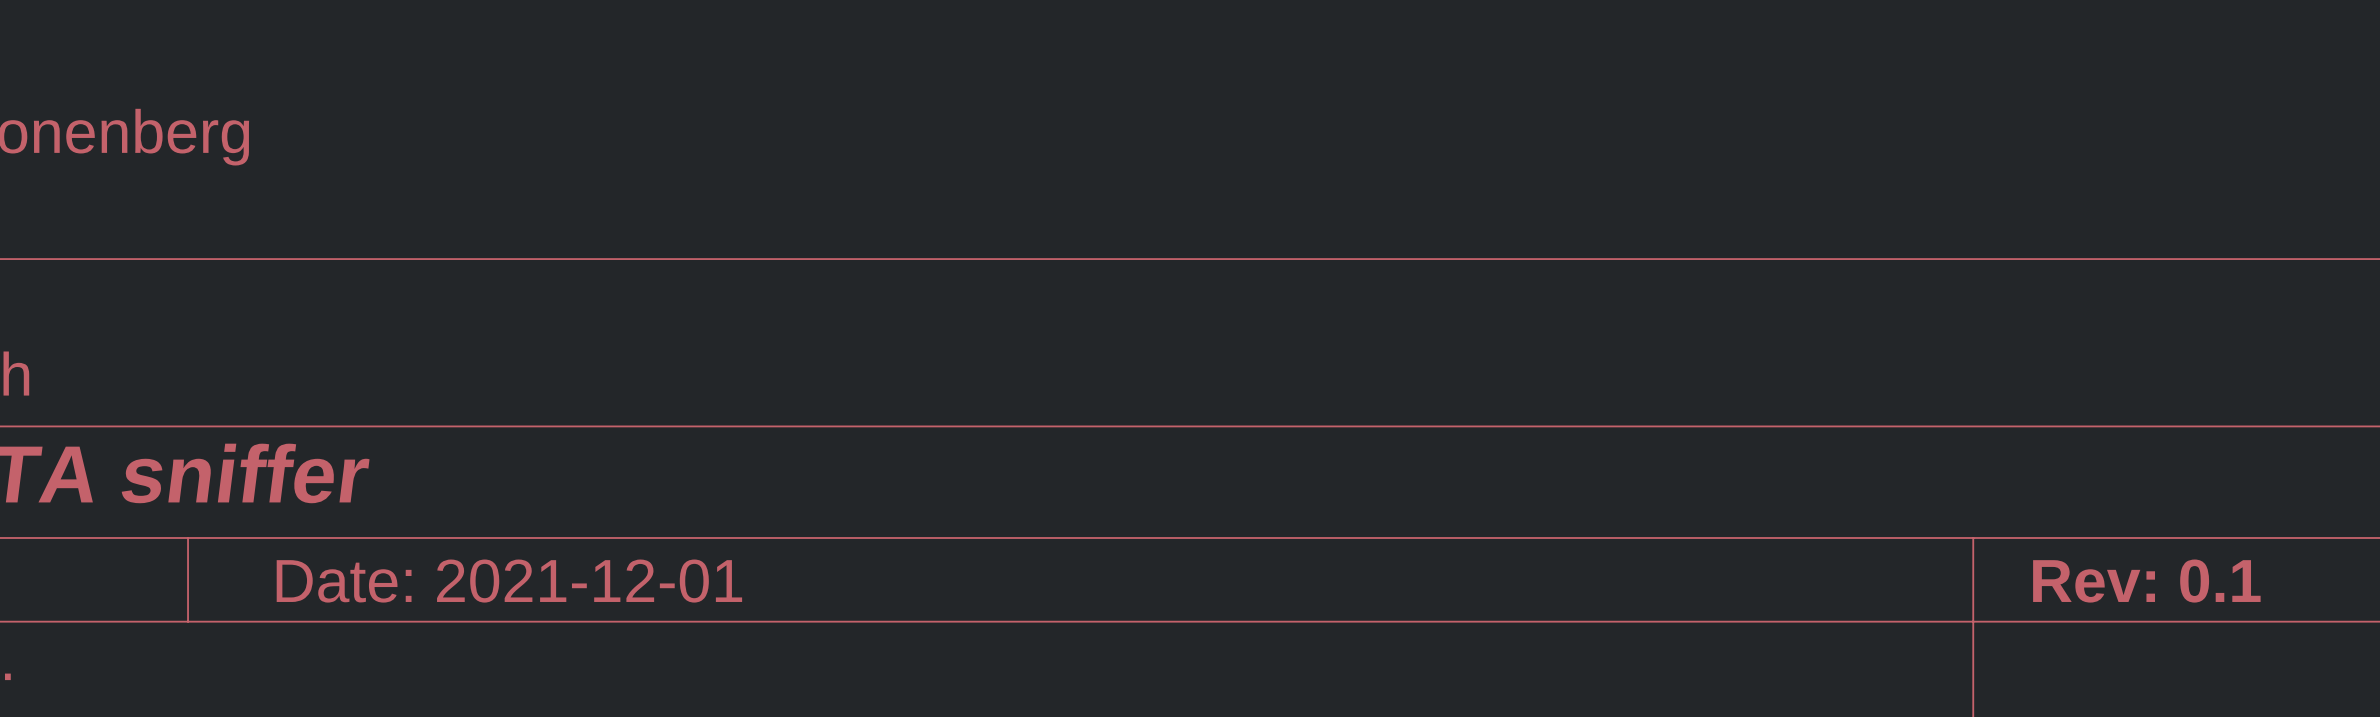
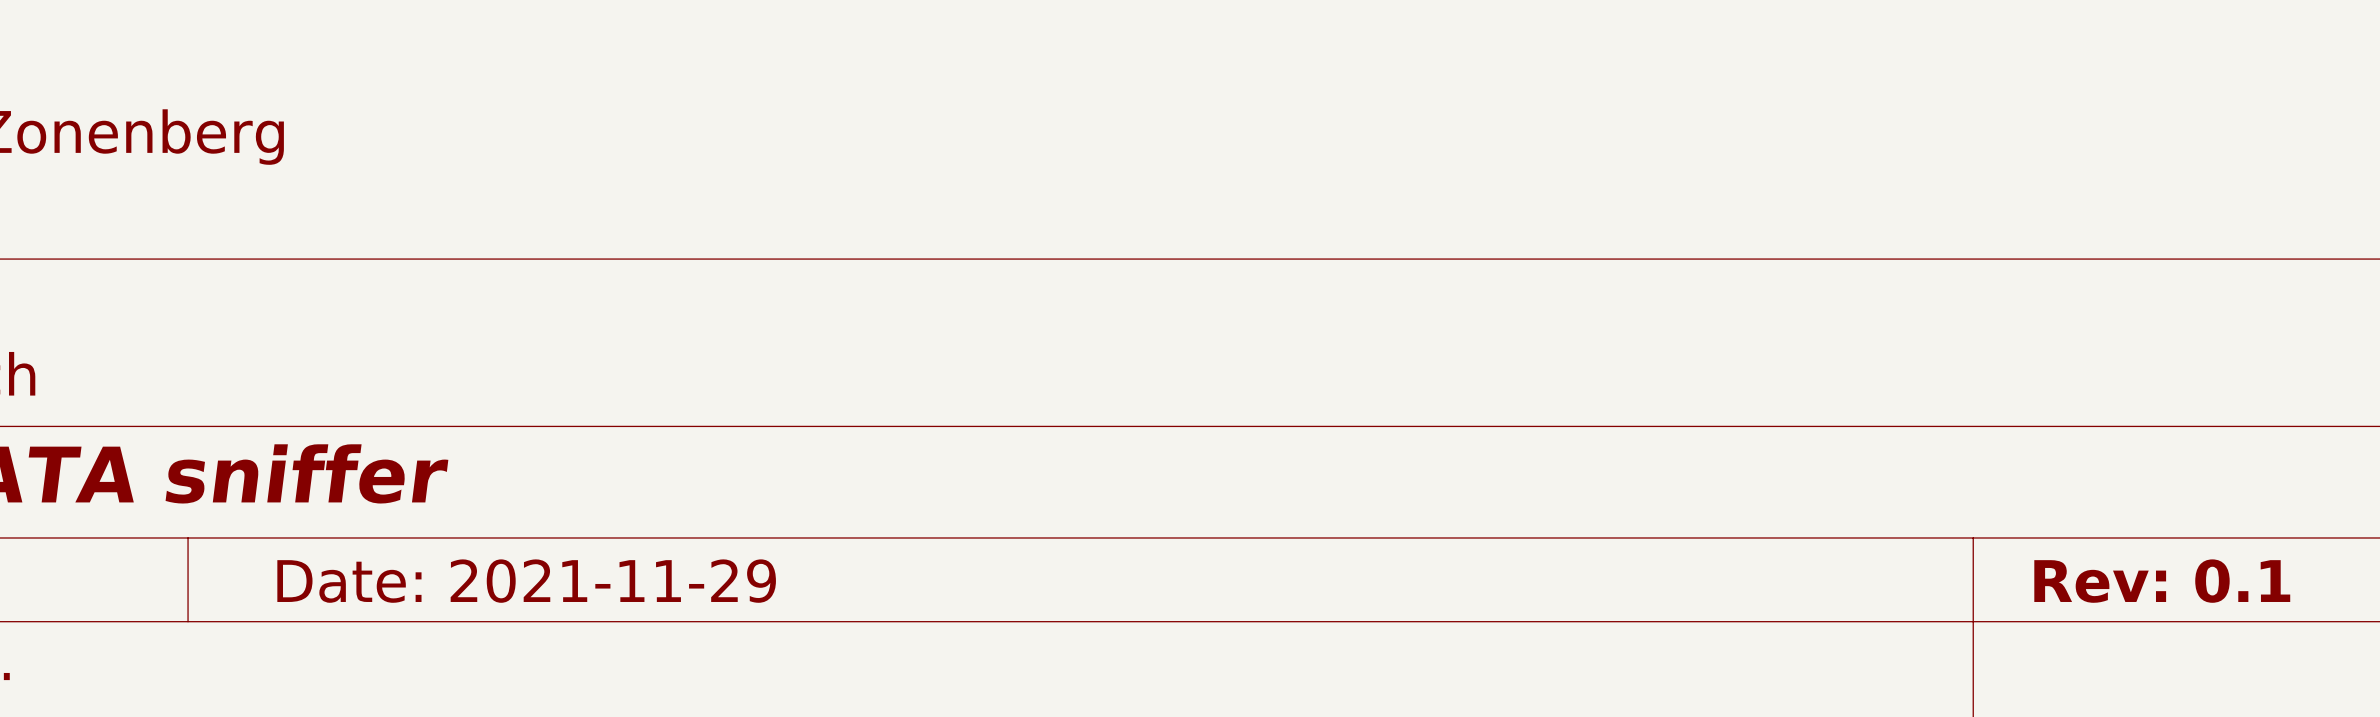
title block: Date: 2021-12-01 (509, 581) -> Date: 2021-11-29 (526, 581)

